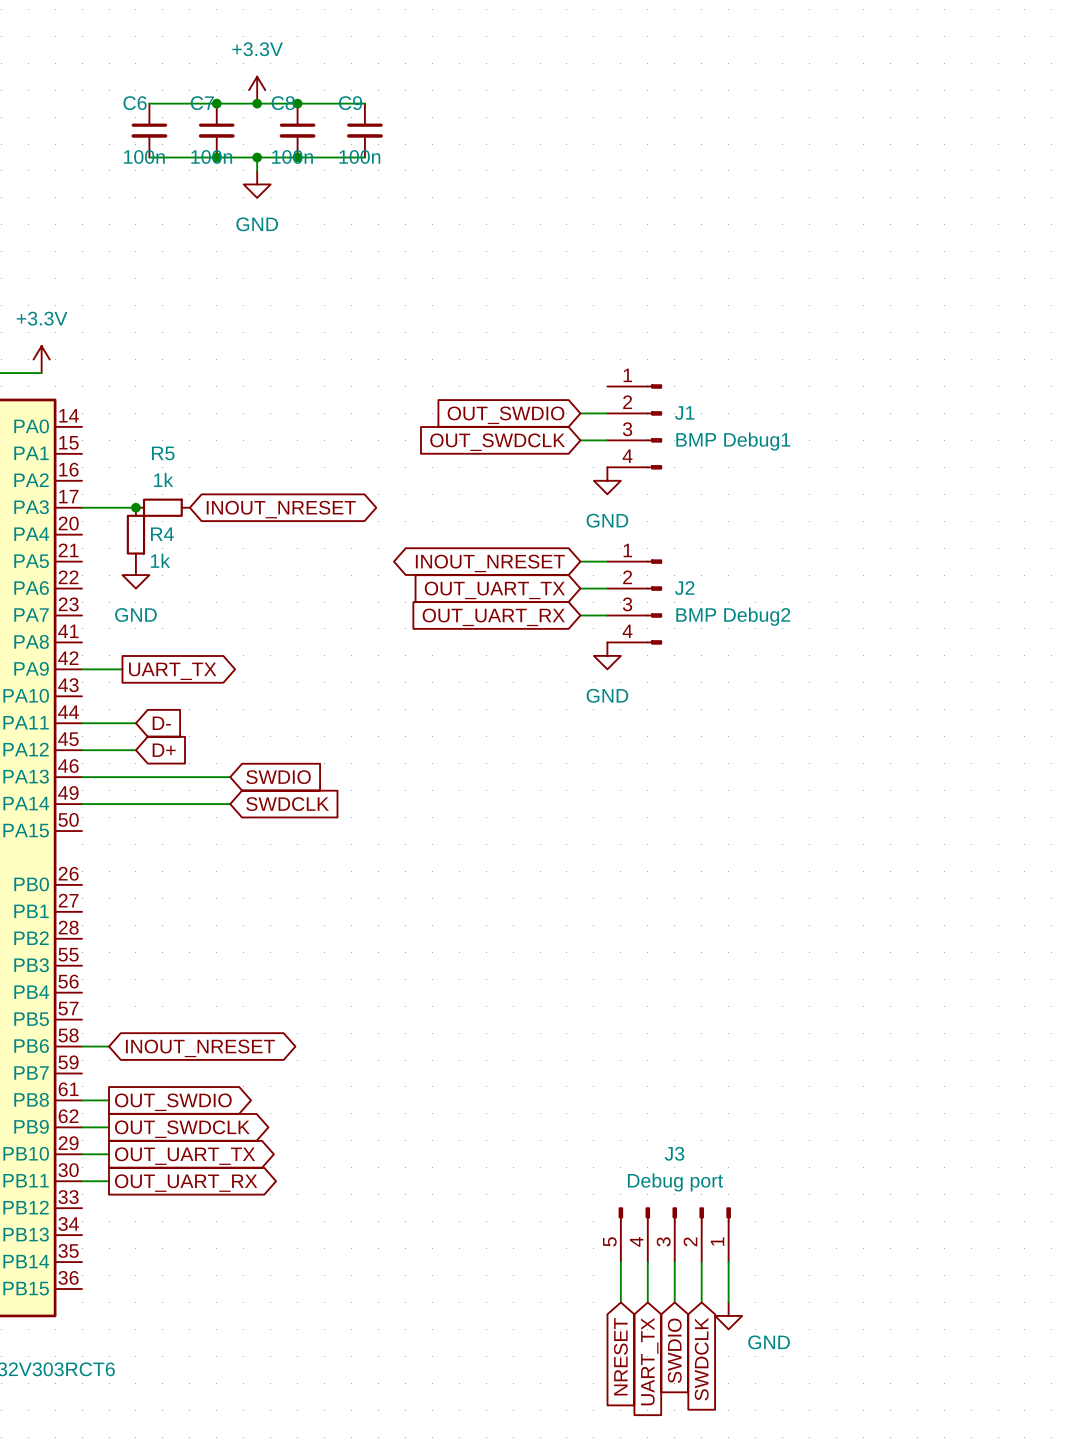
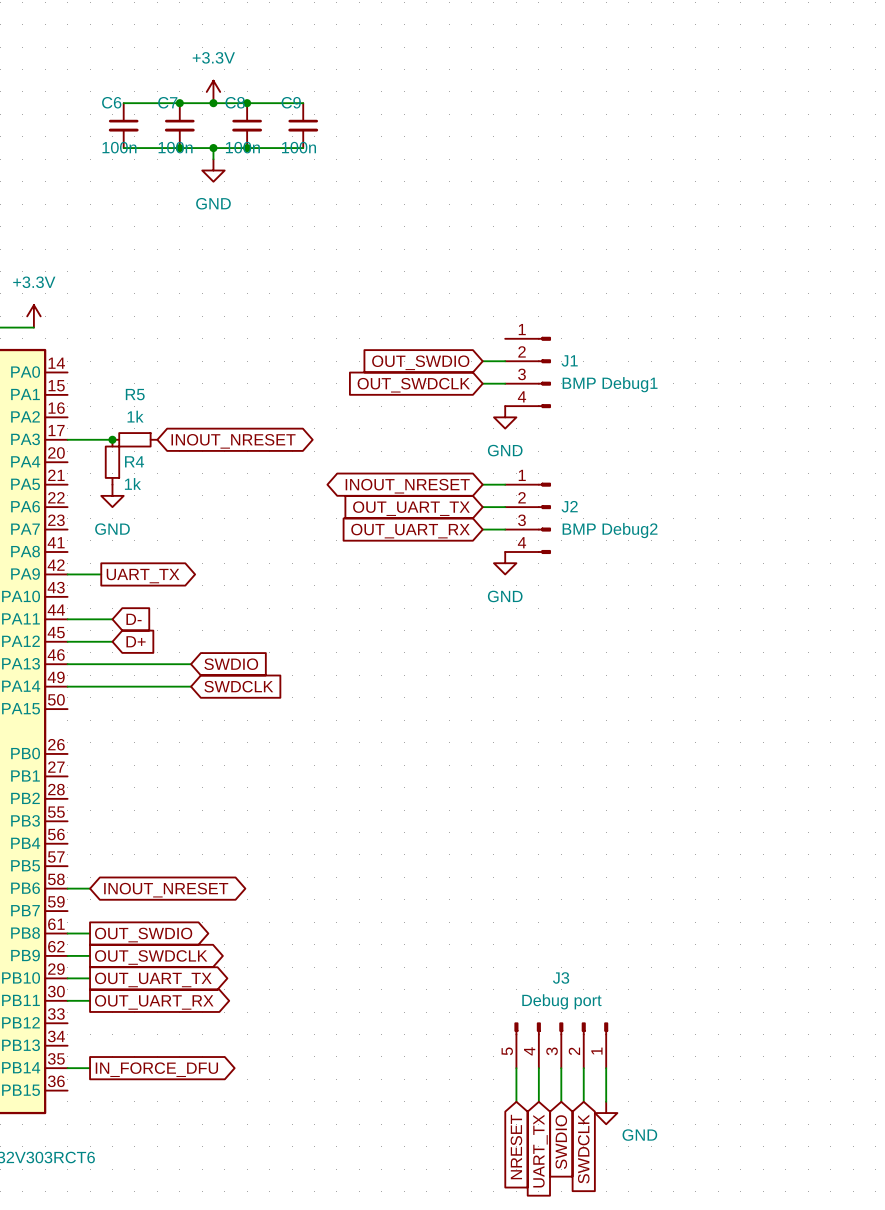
wire: none -> (67, 1068) (90, 1068)
global label: none -> IN_FORCE_DFU (156, 1069)

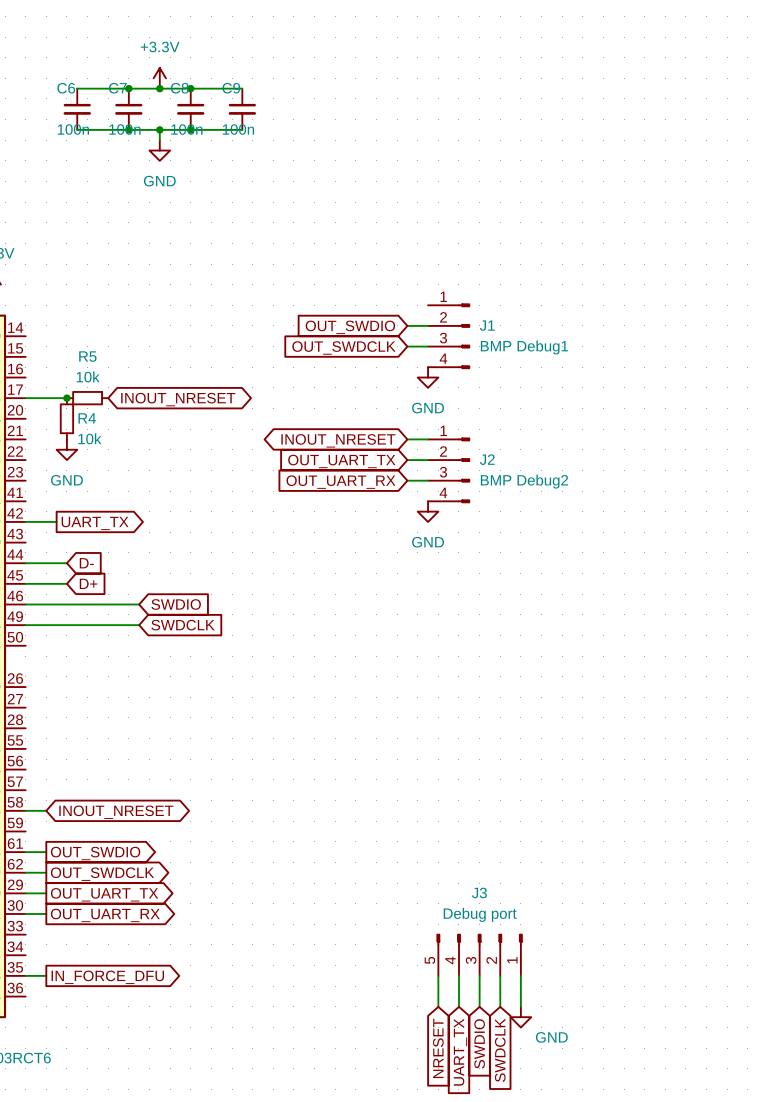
R5 value: 1k (135, 416) -> 10k (88, 376)
R4 value: 1k (132, 483) -> 10k (89, 438)

